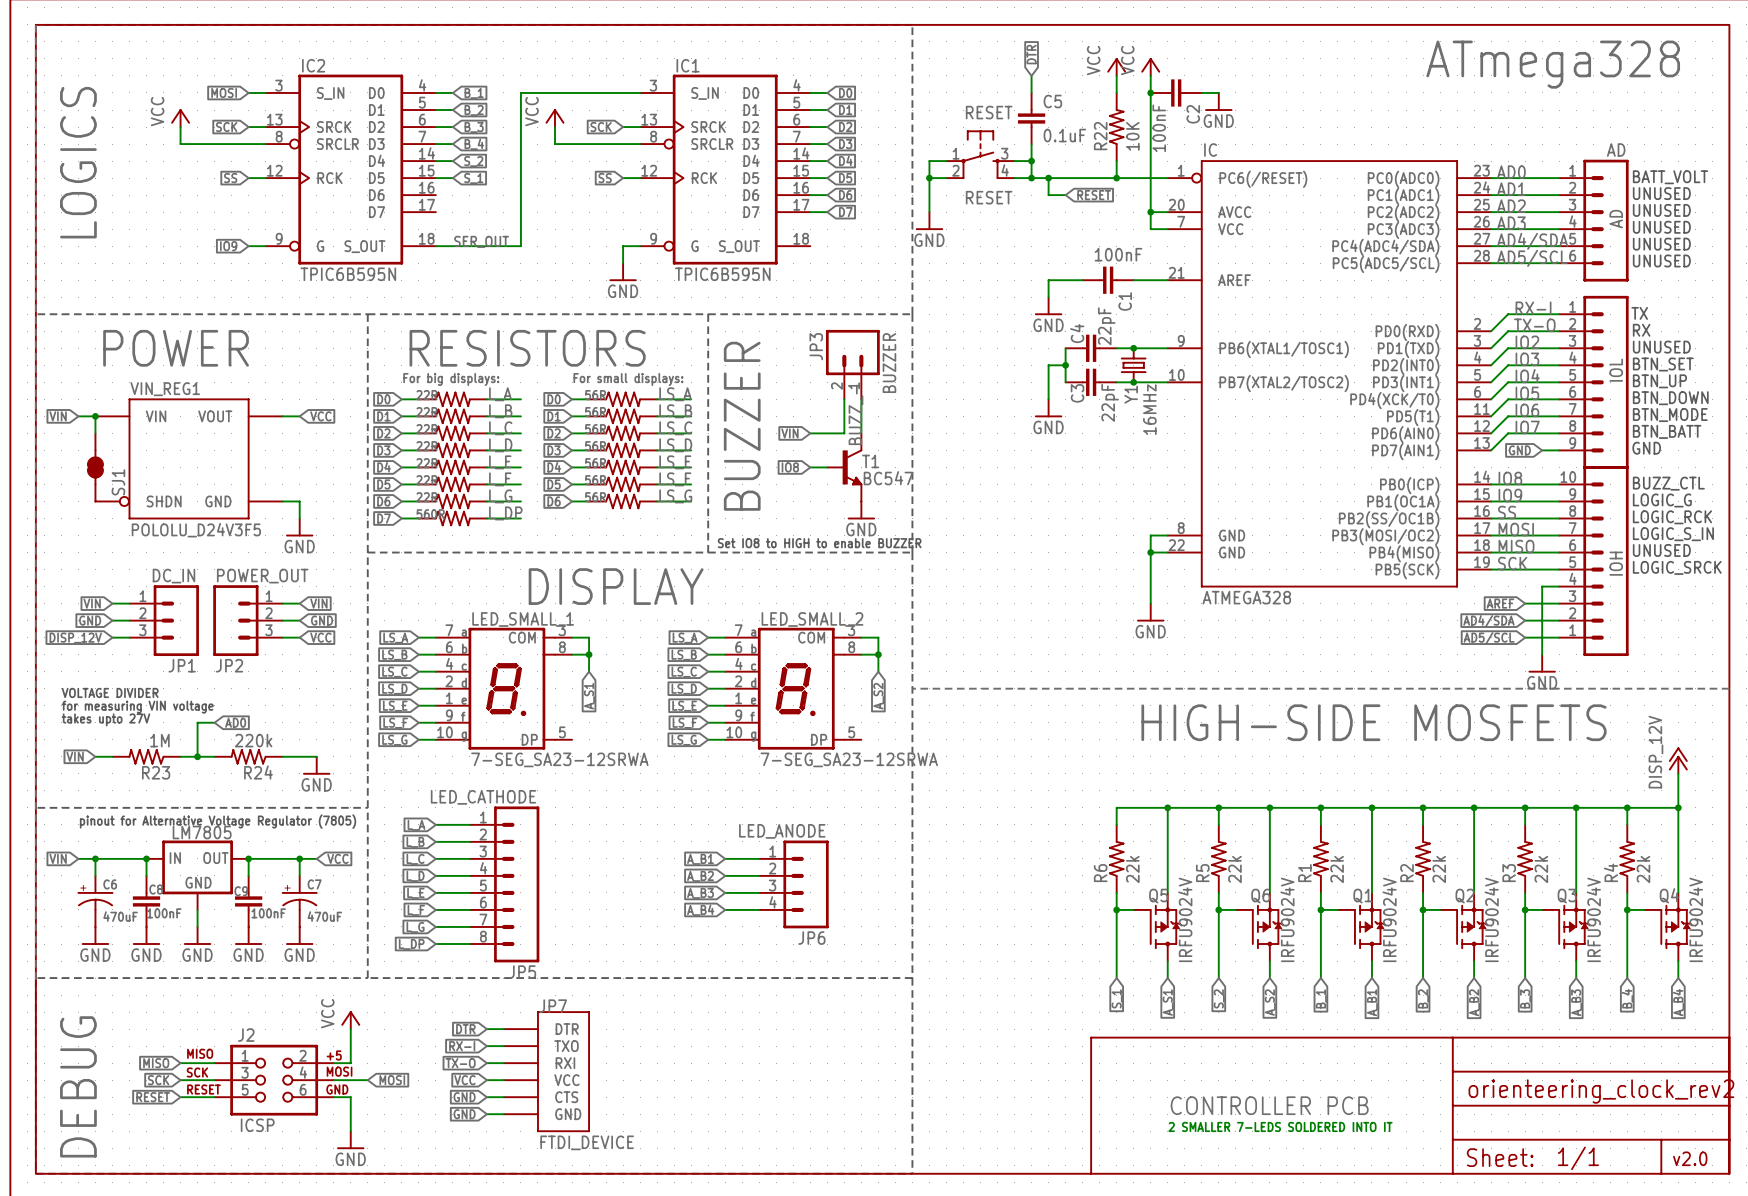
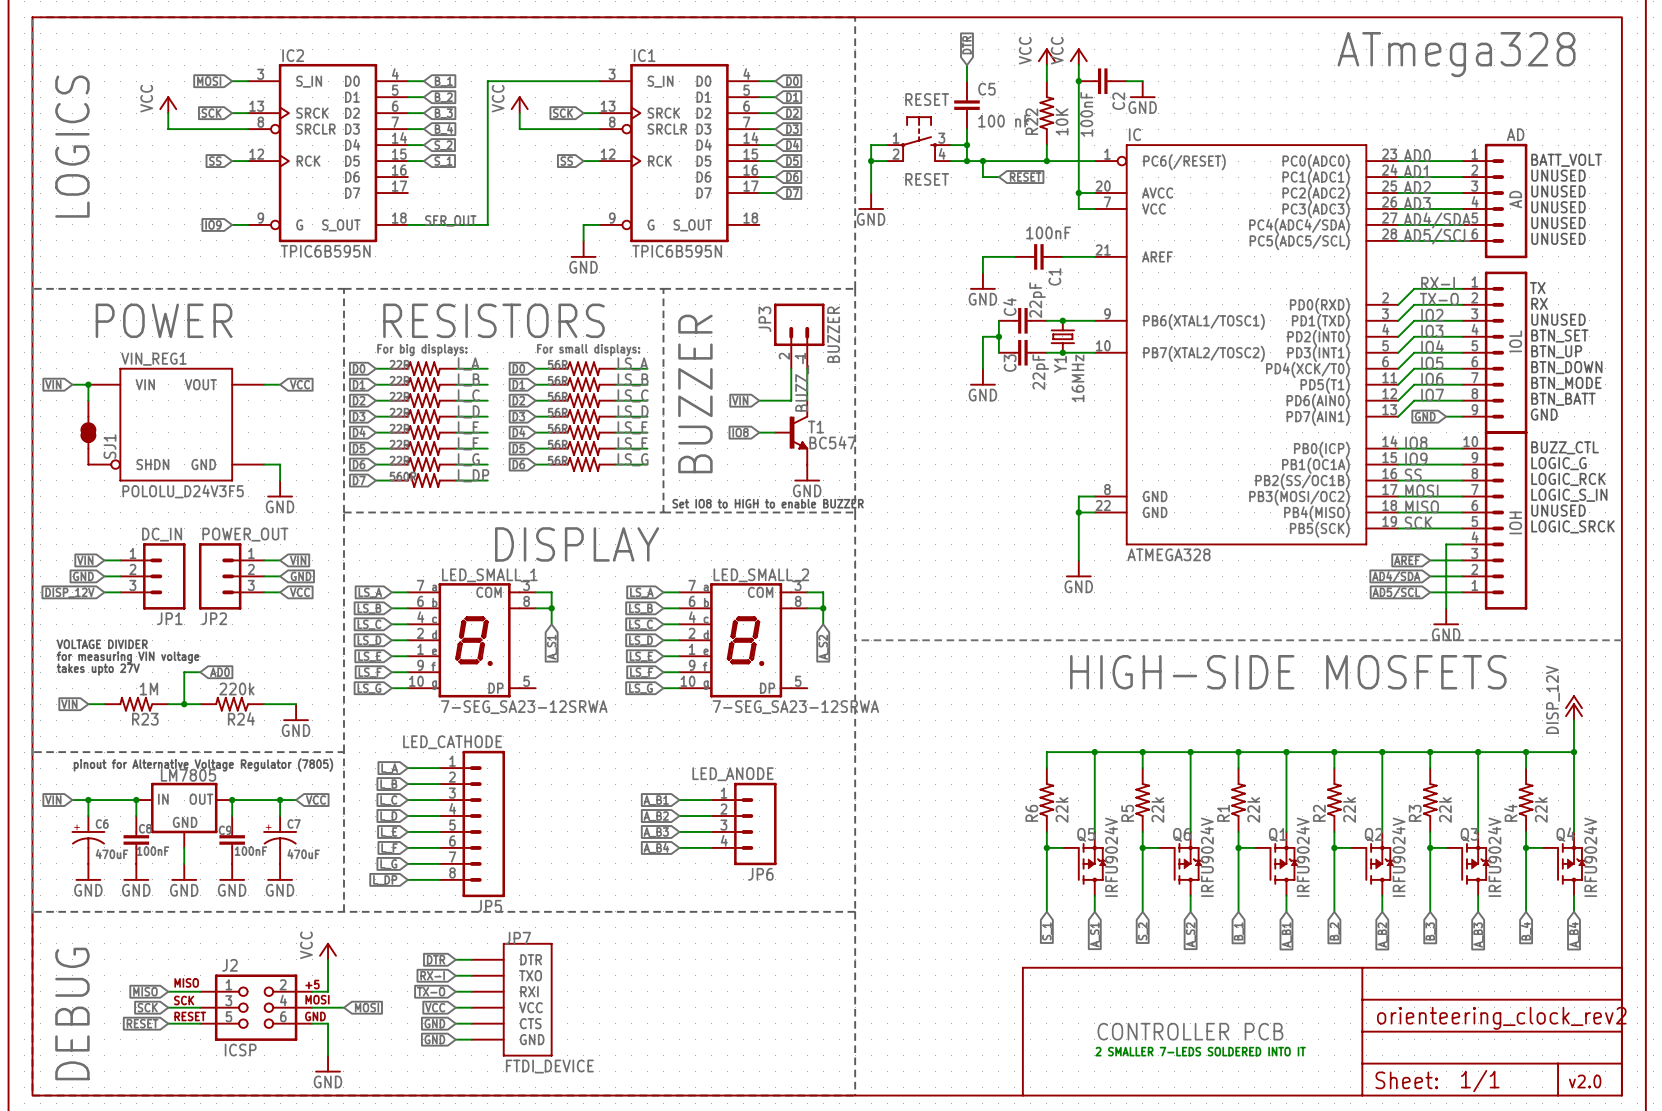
C5 value: 0.1uF (1064, 135) -> 100 nF (1004, 121)

